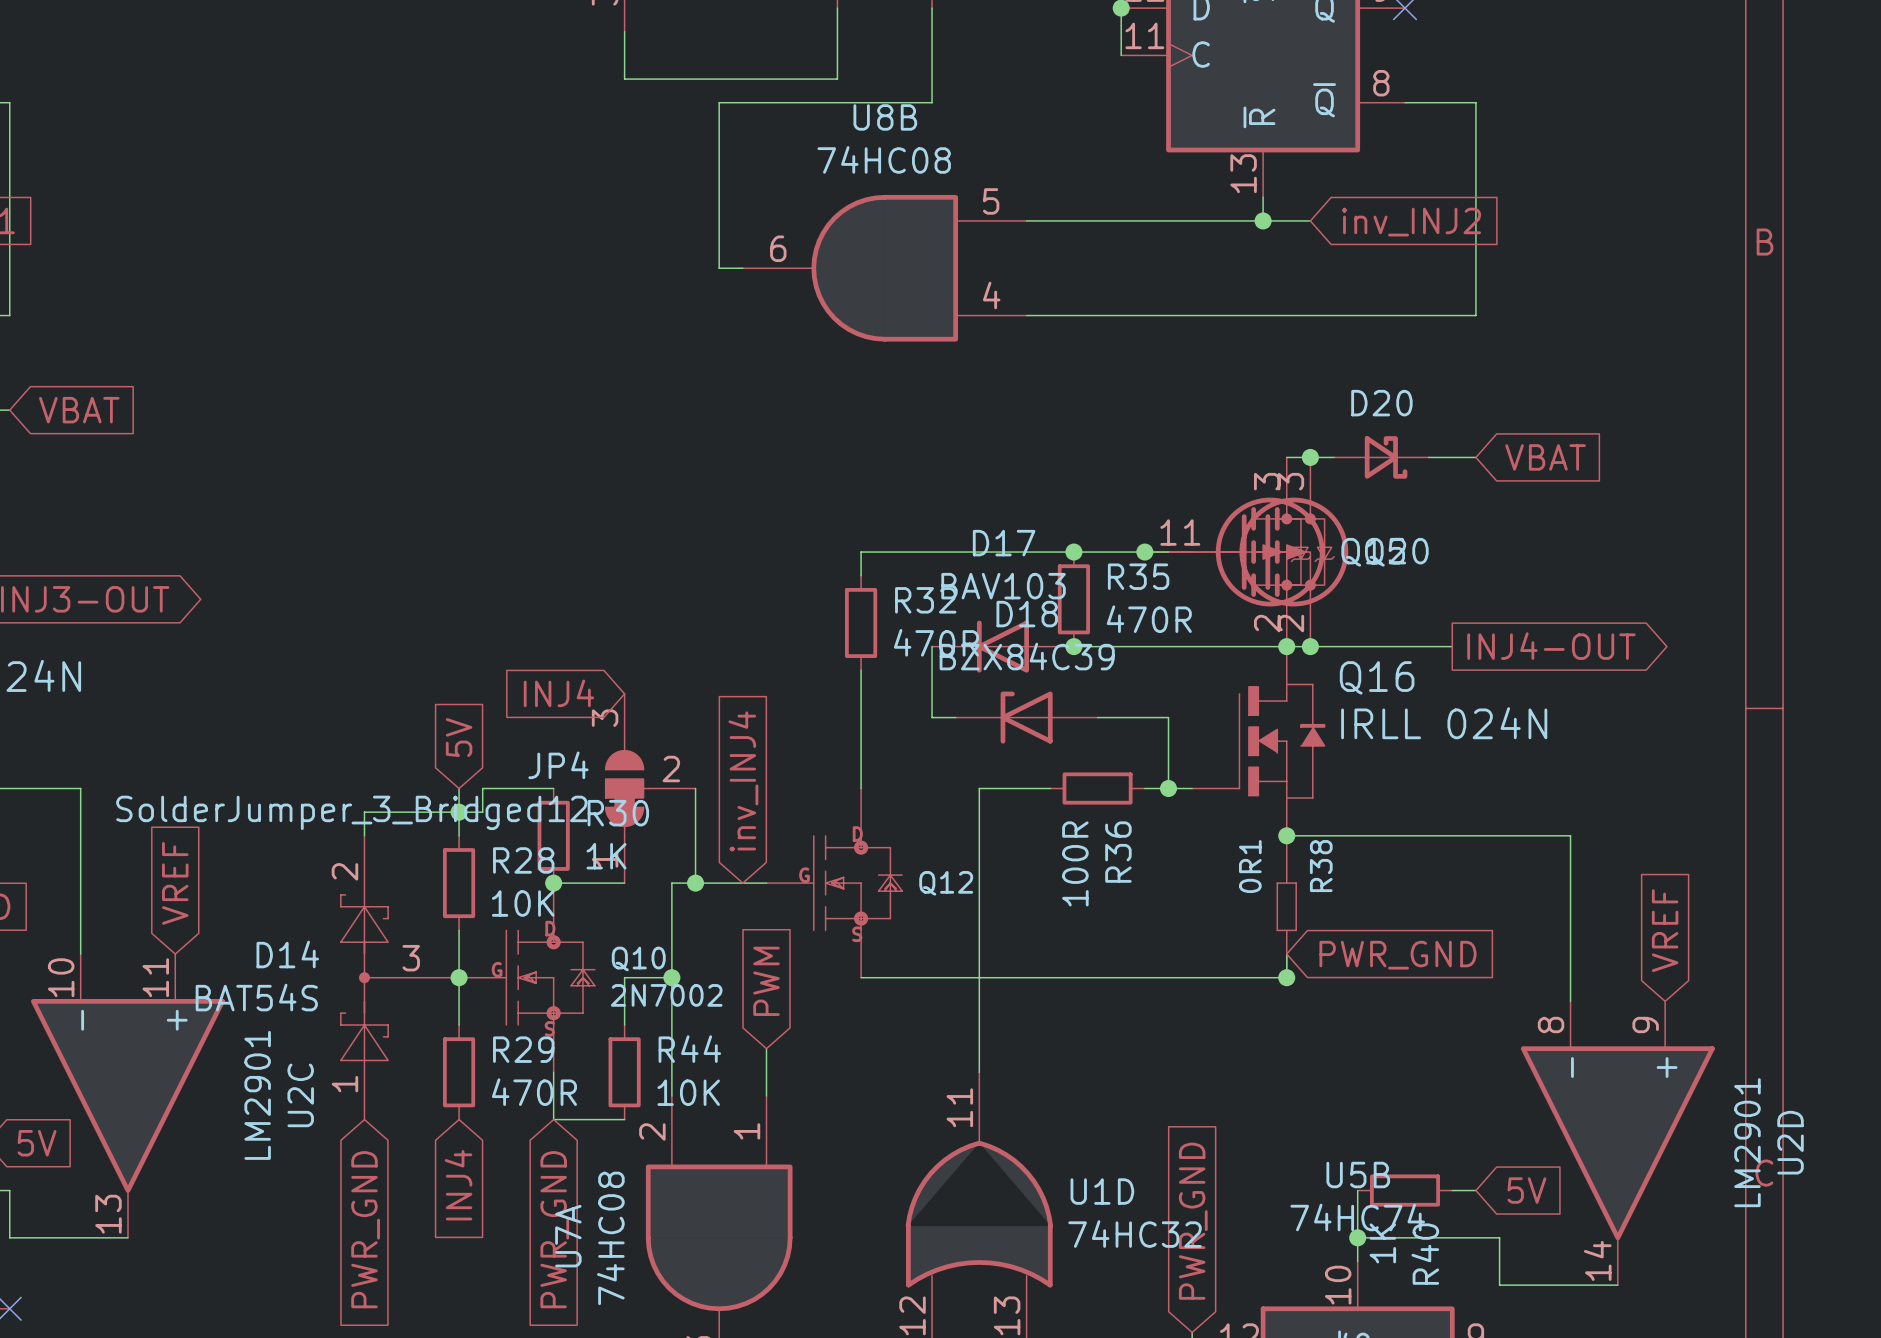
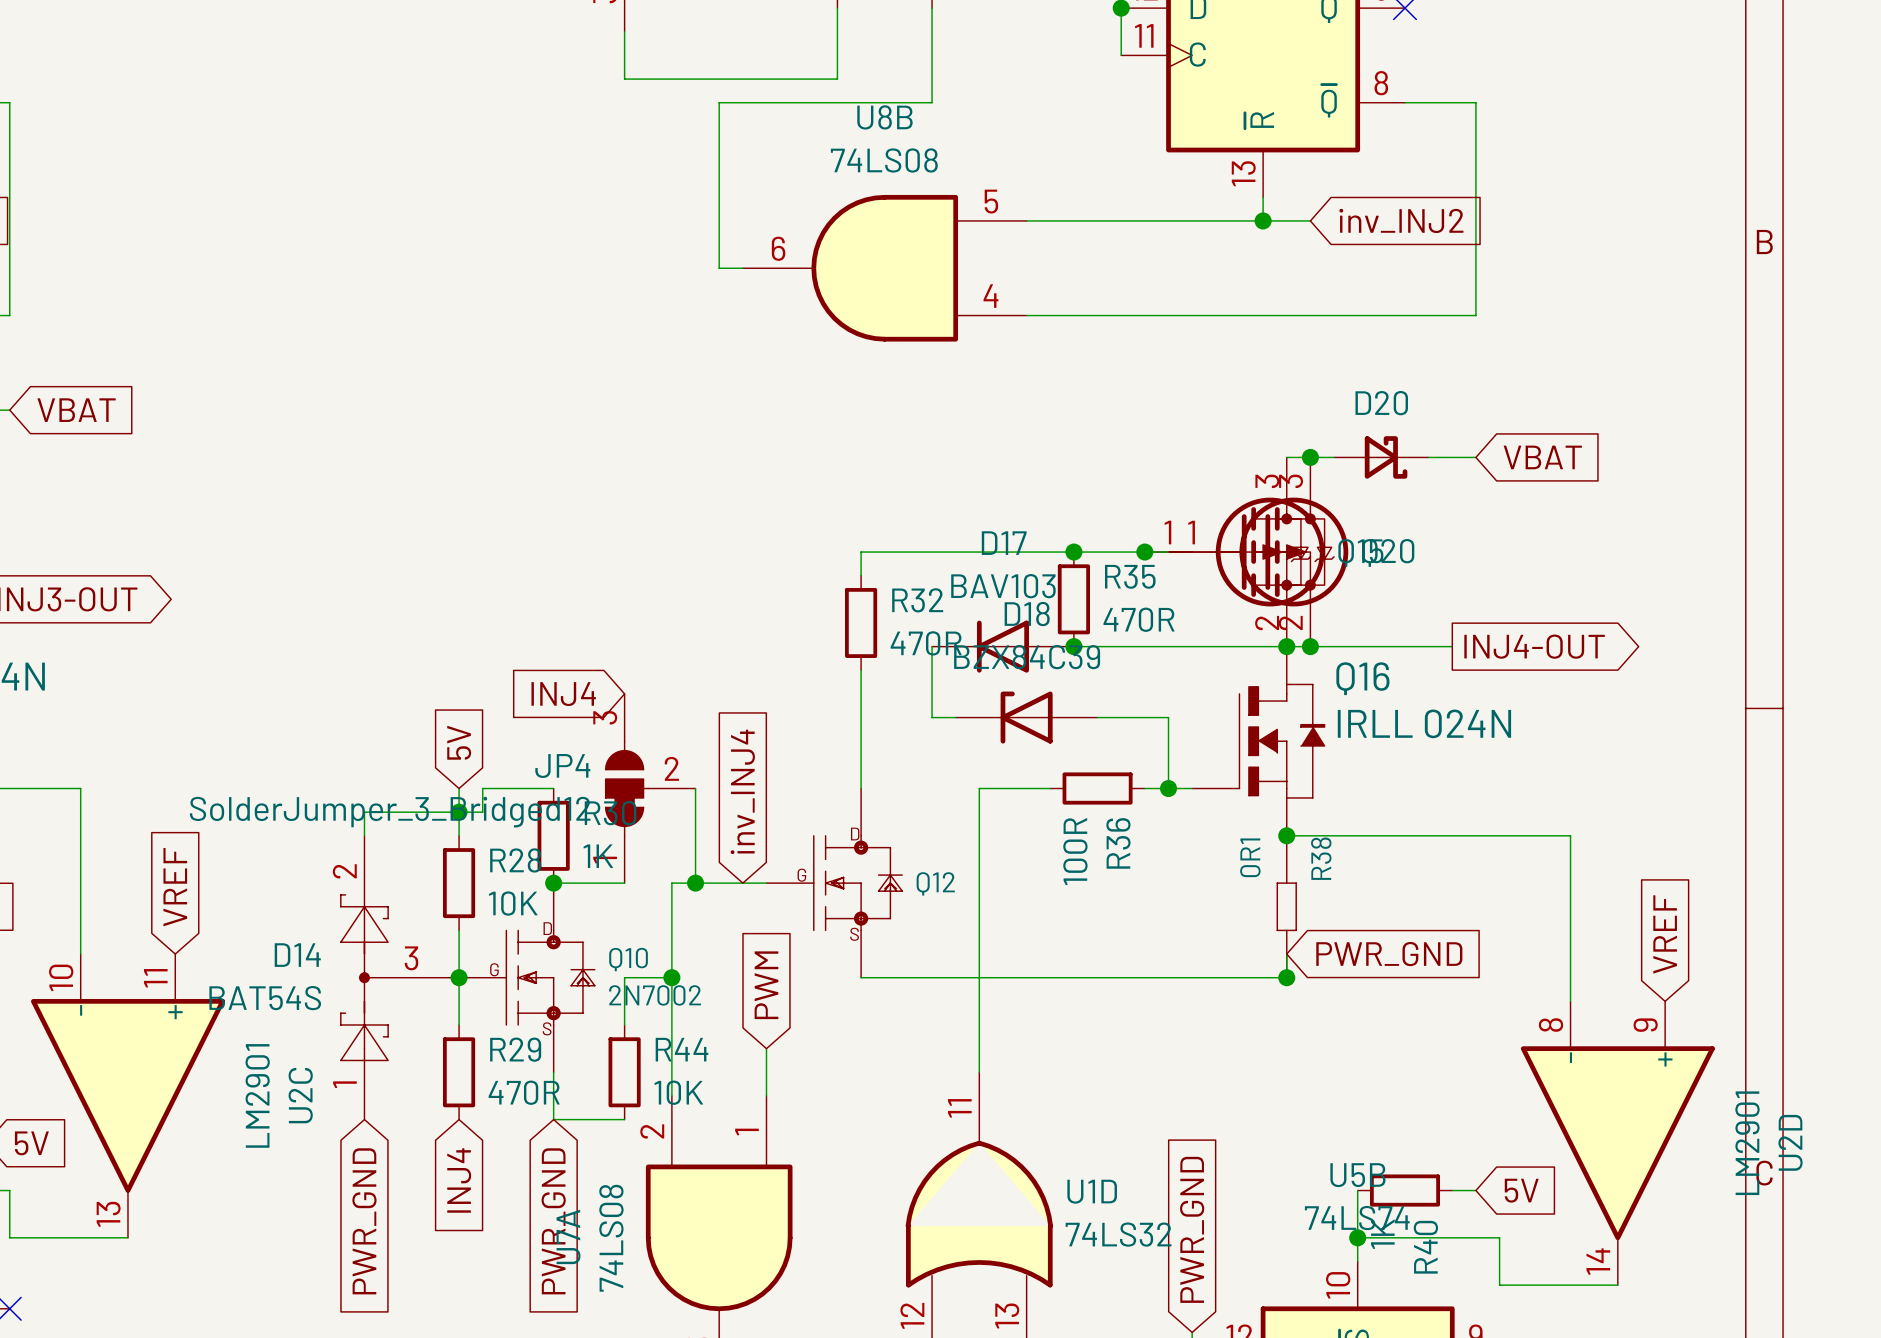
U8B value: 74HC08 (884, 159) -> 74LS08 (884, 160)
U5B value: 74HC74 (1357, 1217) -> 74LS74 (1357, 1218)
U1D value: 74HC32 (1135, 1234) -> 74LS32 (1118, 1234)
U7A value: 74HC08 (610, 1238) -> 74LS08 (611, 1238)

